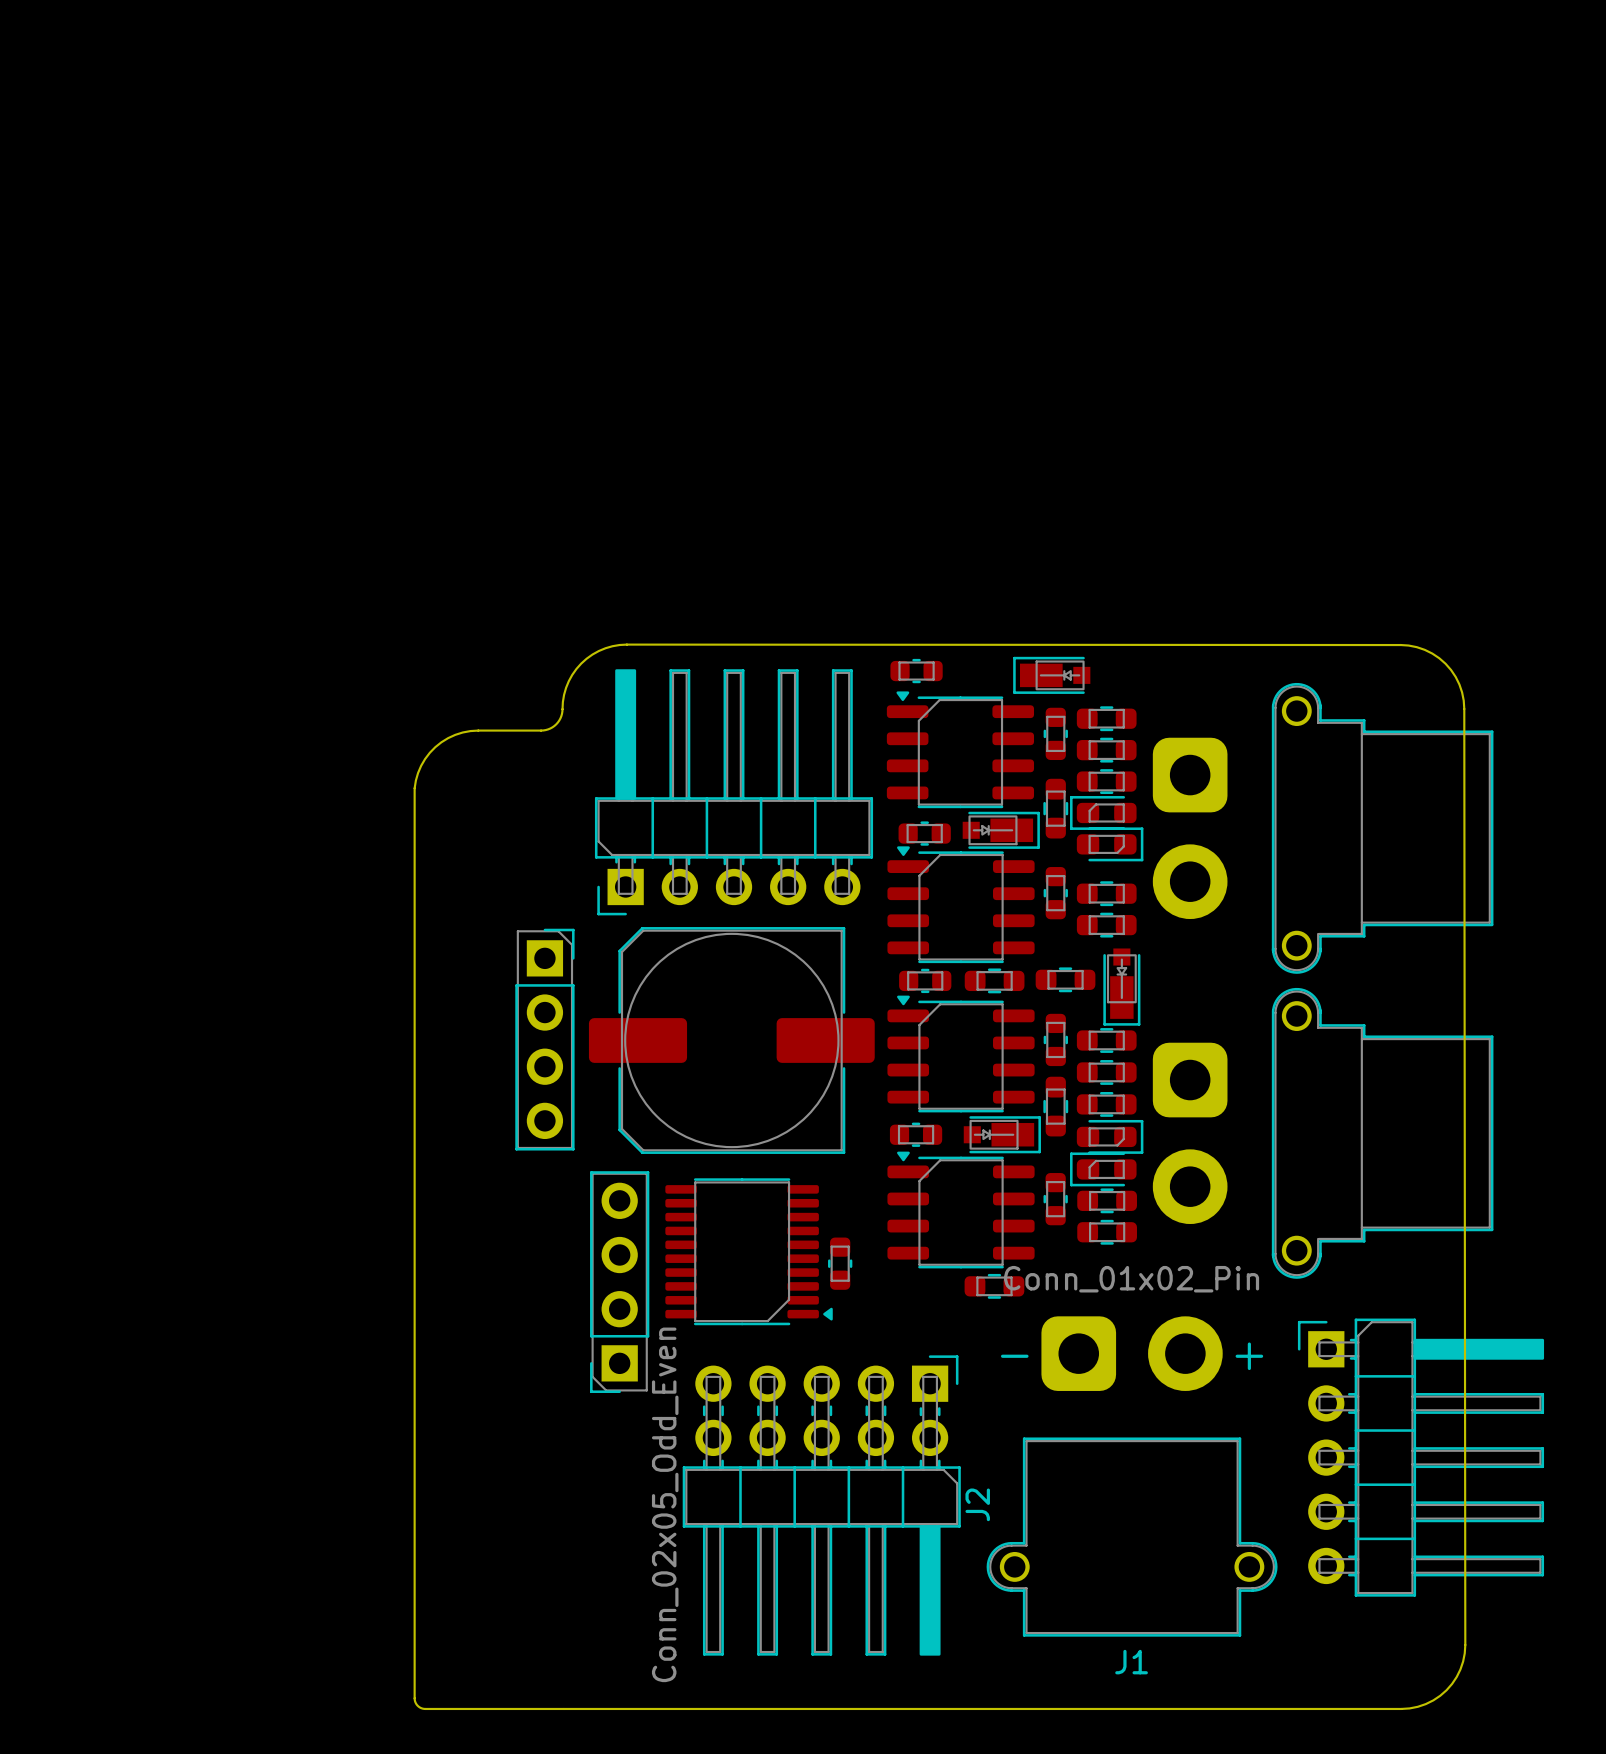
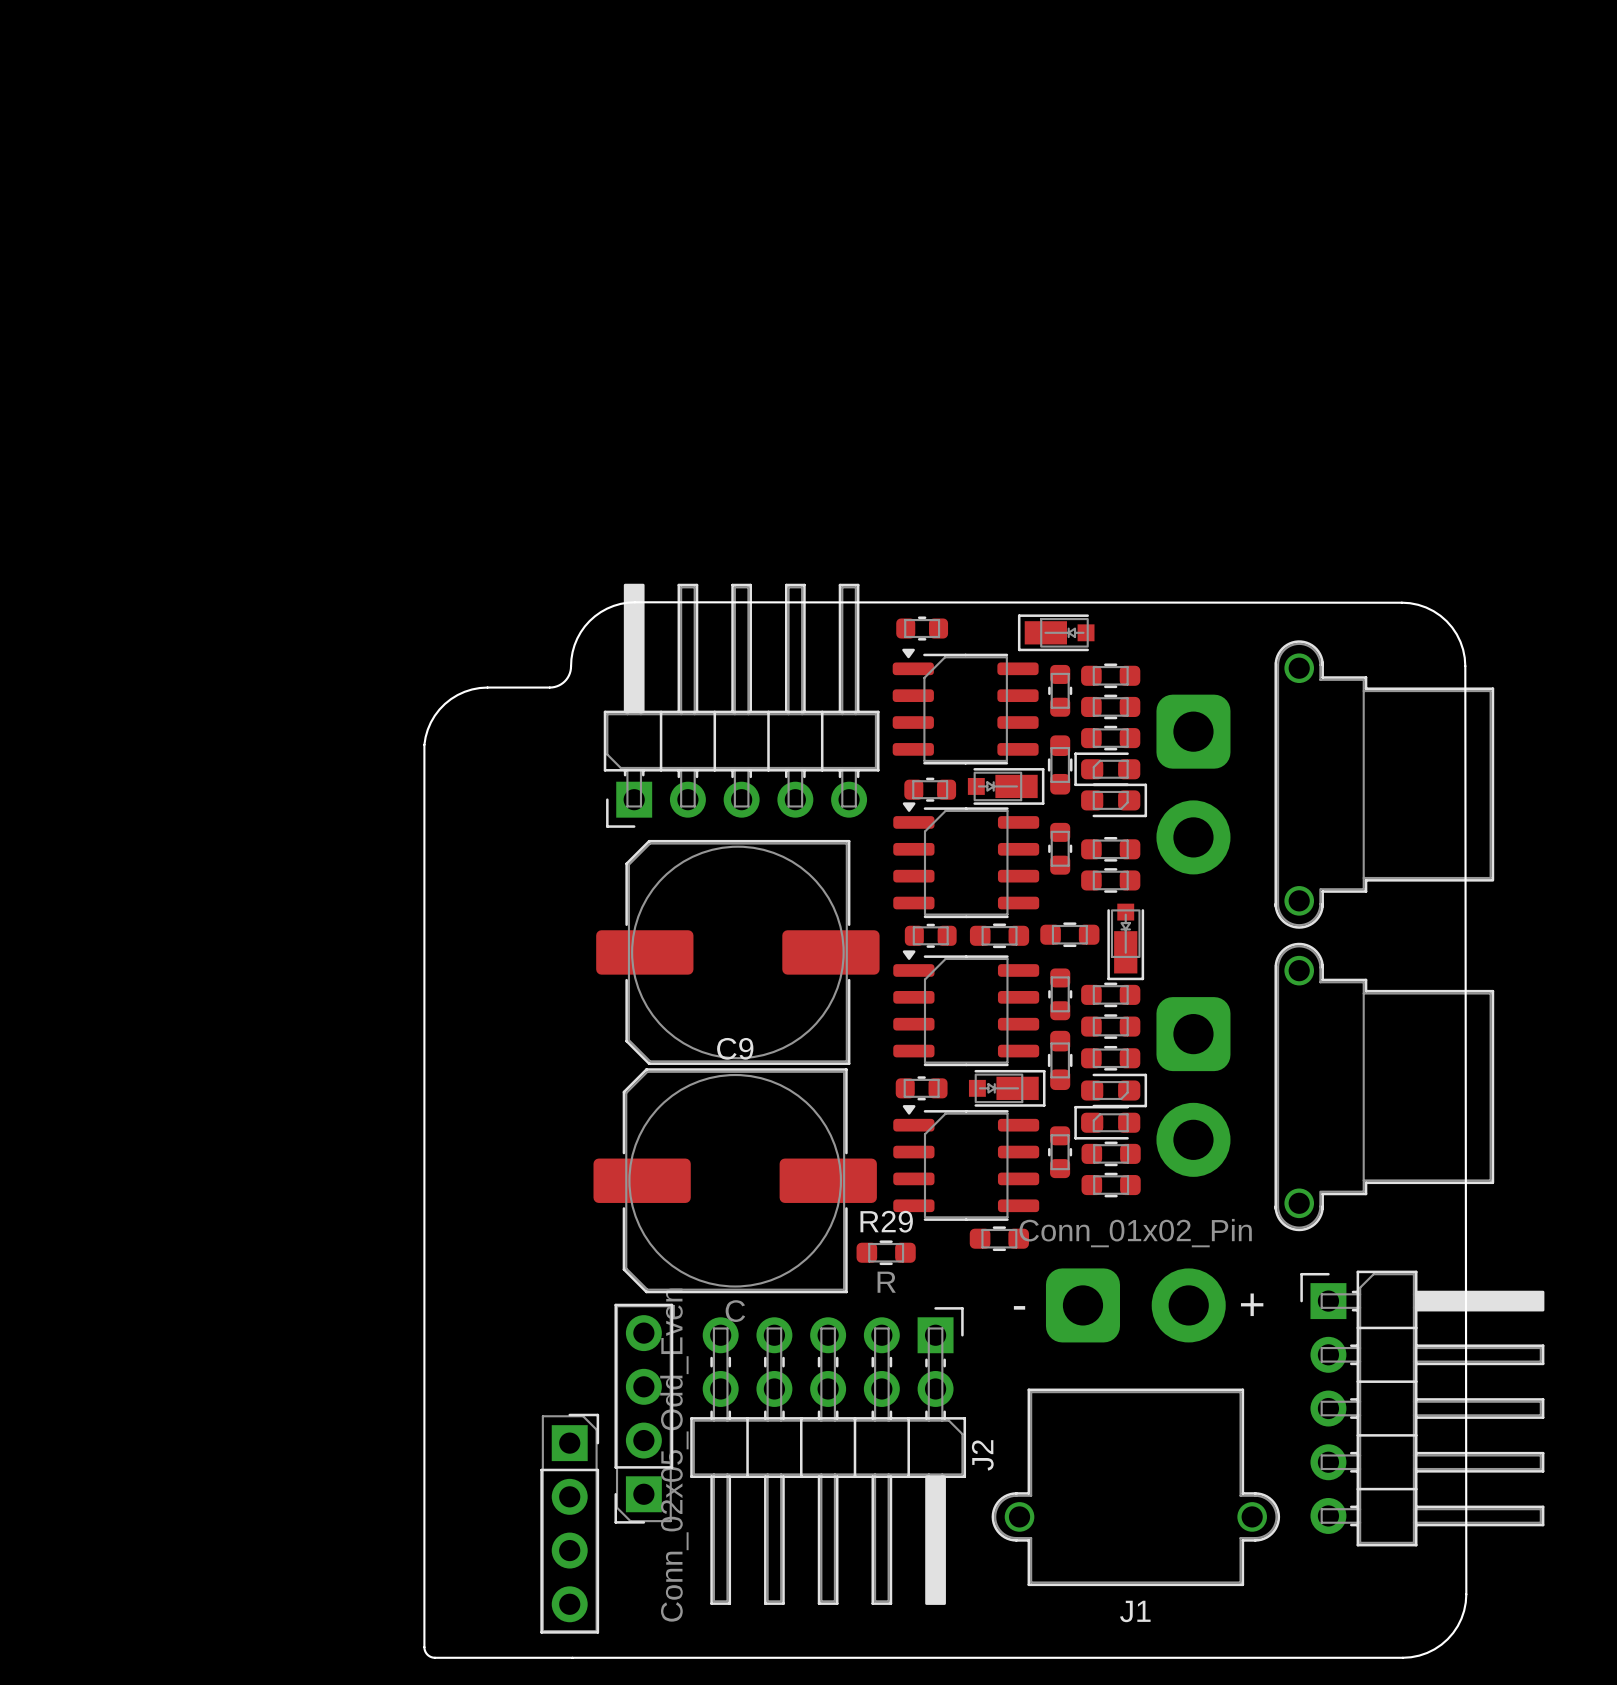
part position: (734, 792) -> (741, 705)
part: (544, 1039) -> none
part position: (731, 1040) -> (737, 952)
C9: none -> C (735, 1180)
part: (749, 1251) -> none
part: (840, 1263) -> none
part: (619, 1282) -> none
R29: none -> R (886, 1252)
part: none -> (643, 1413)
part: none -> (569, 1523)

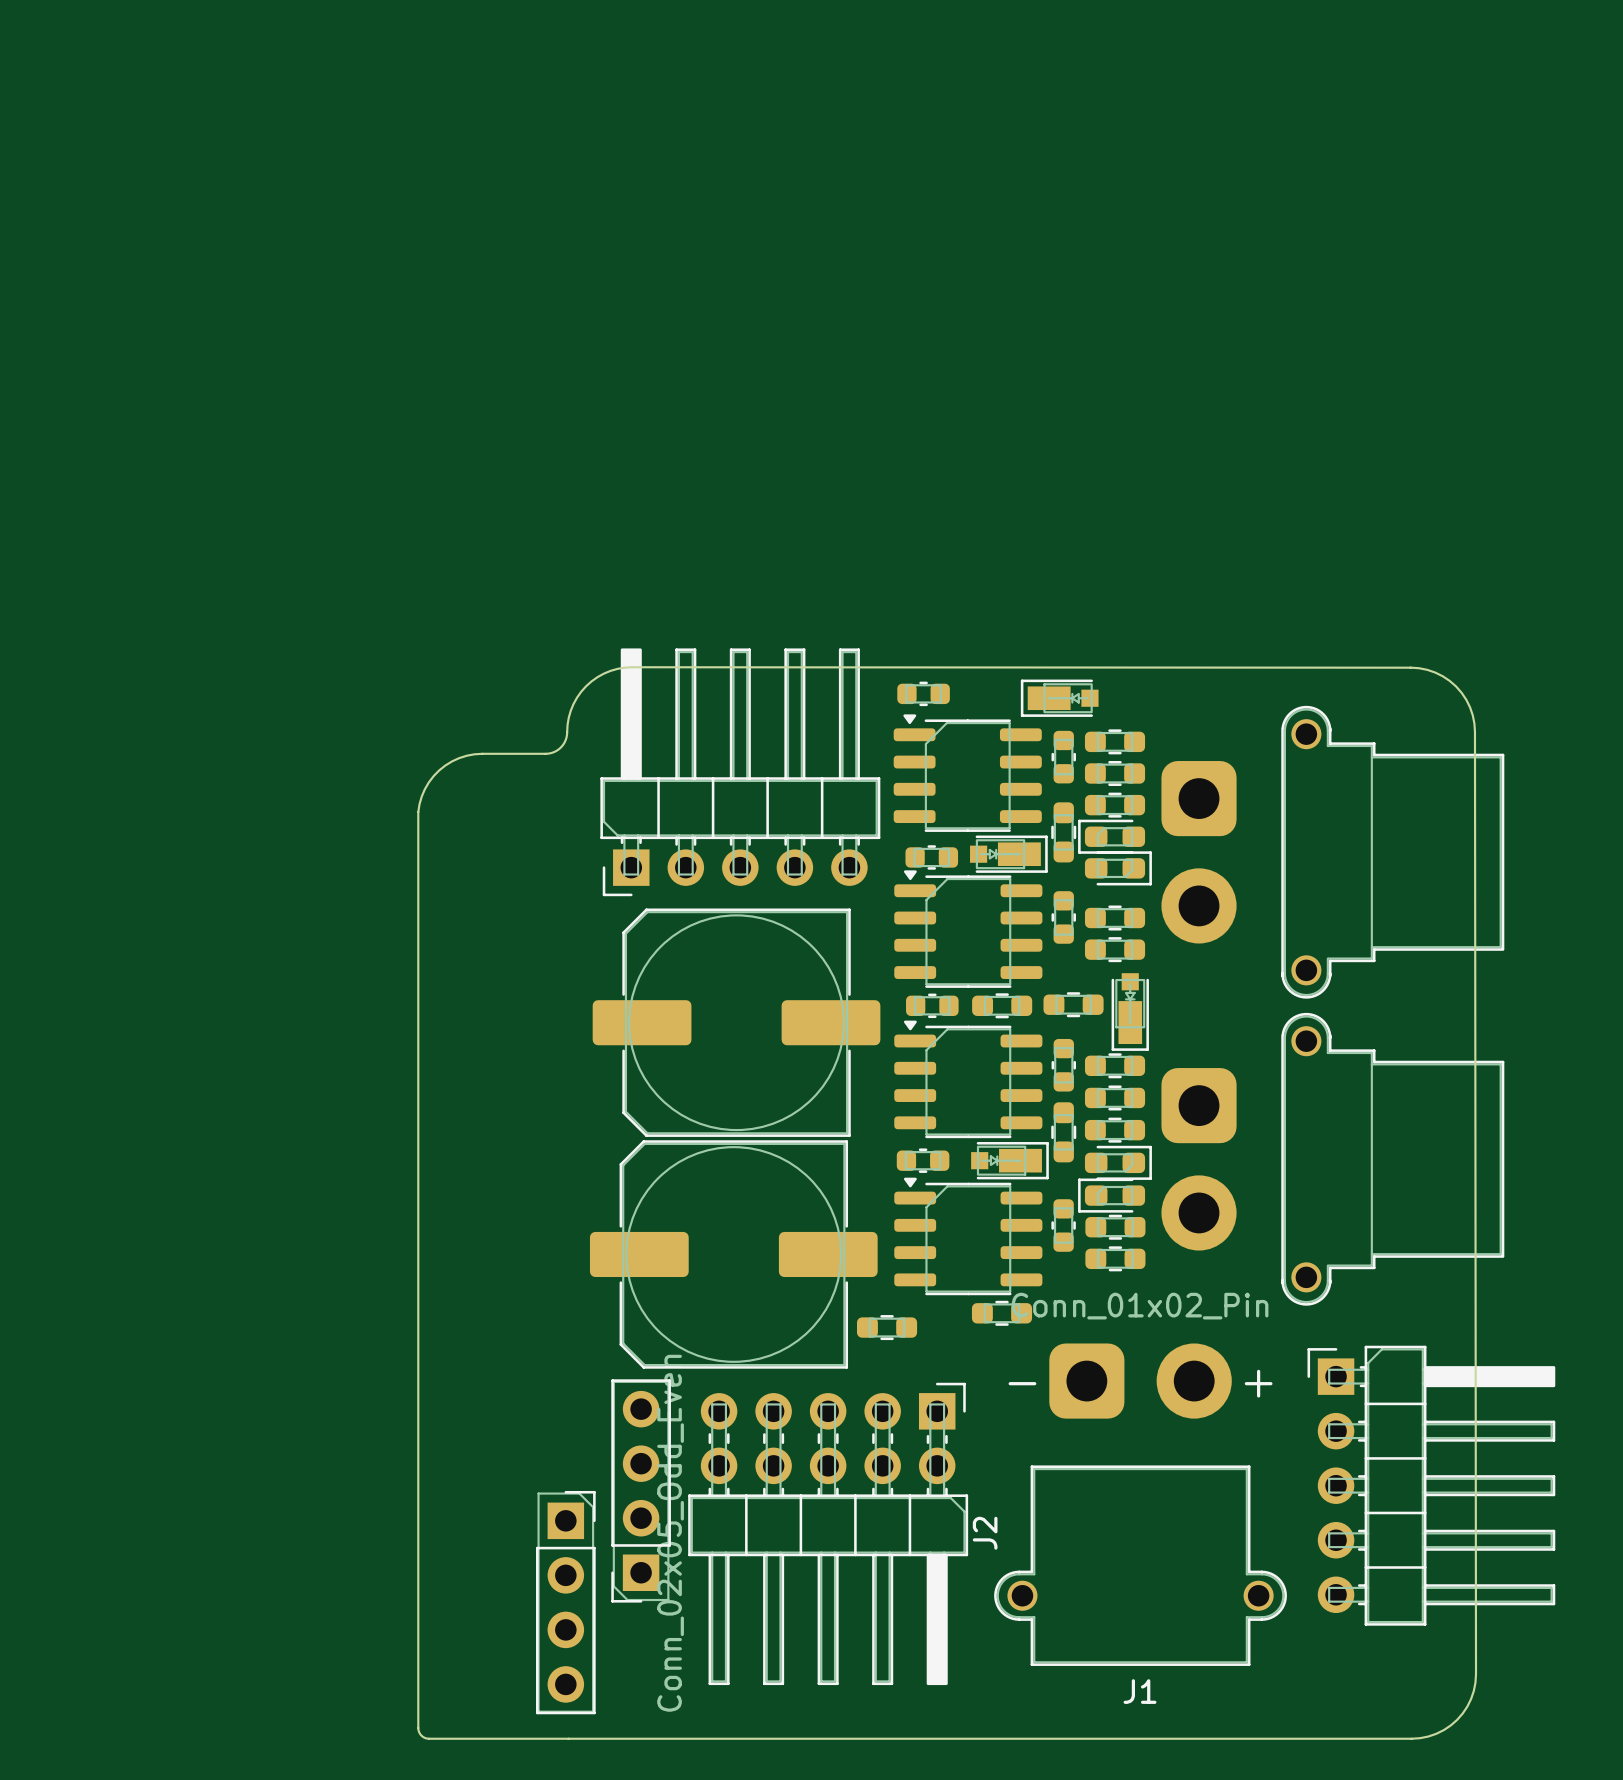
C9 name: C9 (735, 1048) -> none
R29 name: R29 (886, 1221) -> none
R29 value: R (886, 1282) -> none
C9 value: C (735, 1311) -> none

